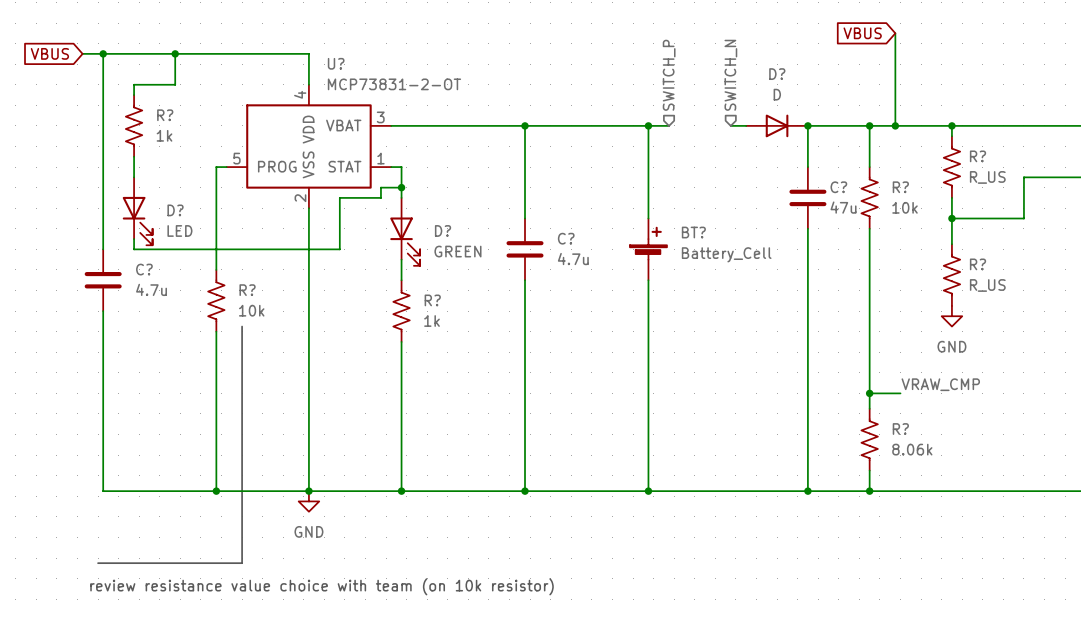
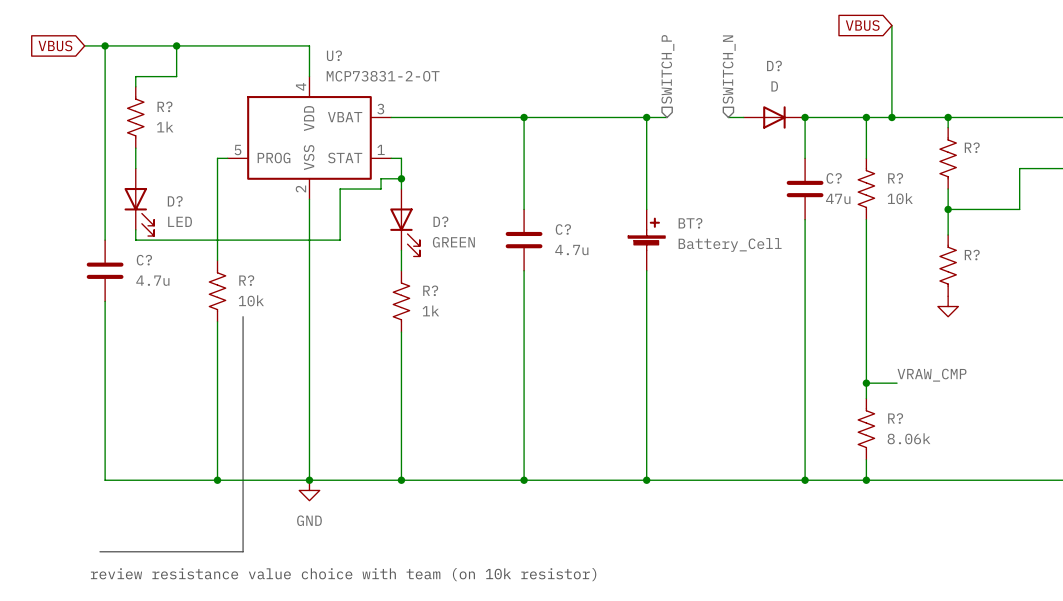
R? value: R_US (987, 177) -> none
R? value: R_US (987, 285) -> none
power symbol text: GND (951, 346) -> none

